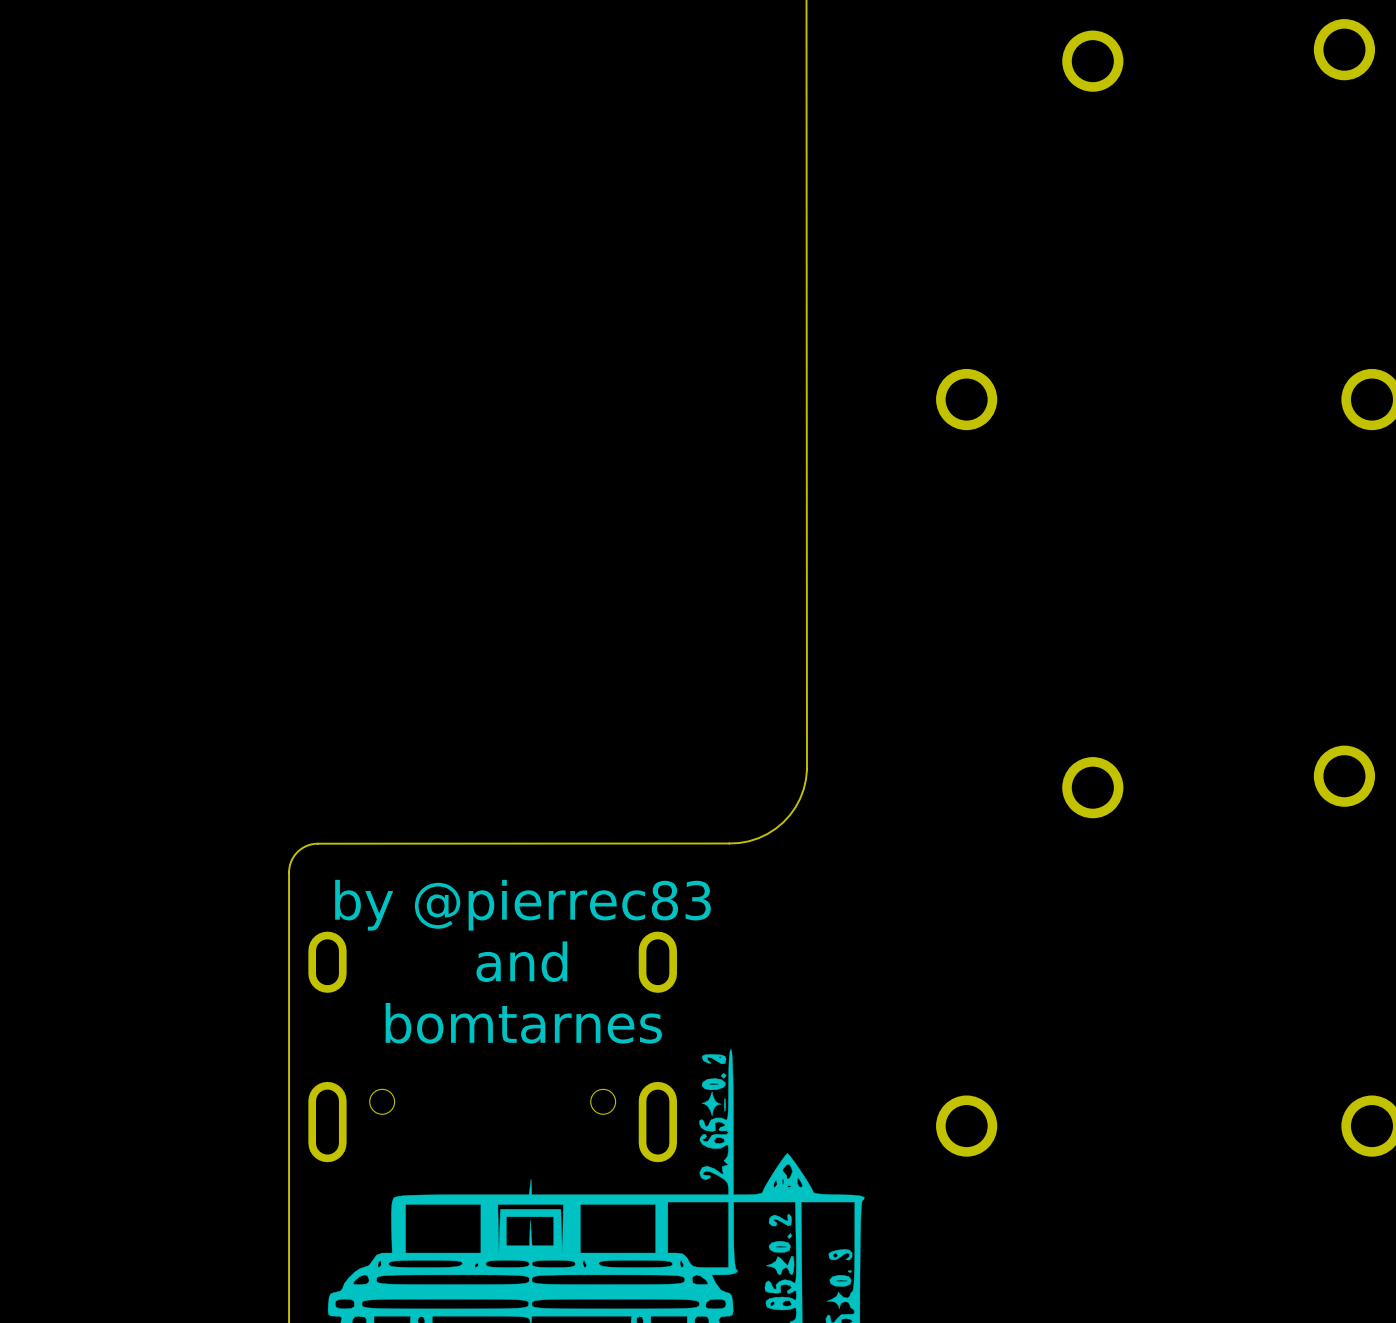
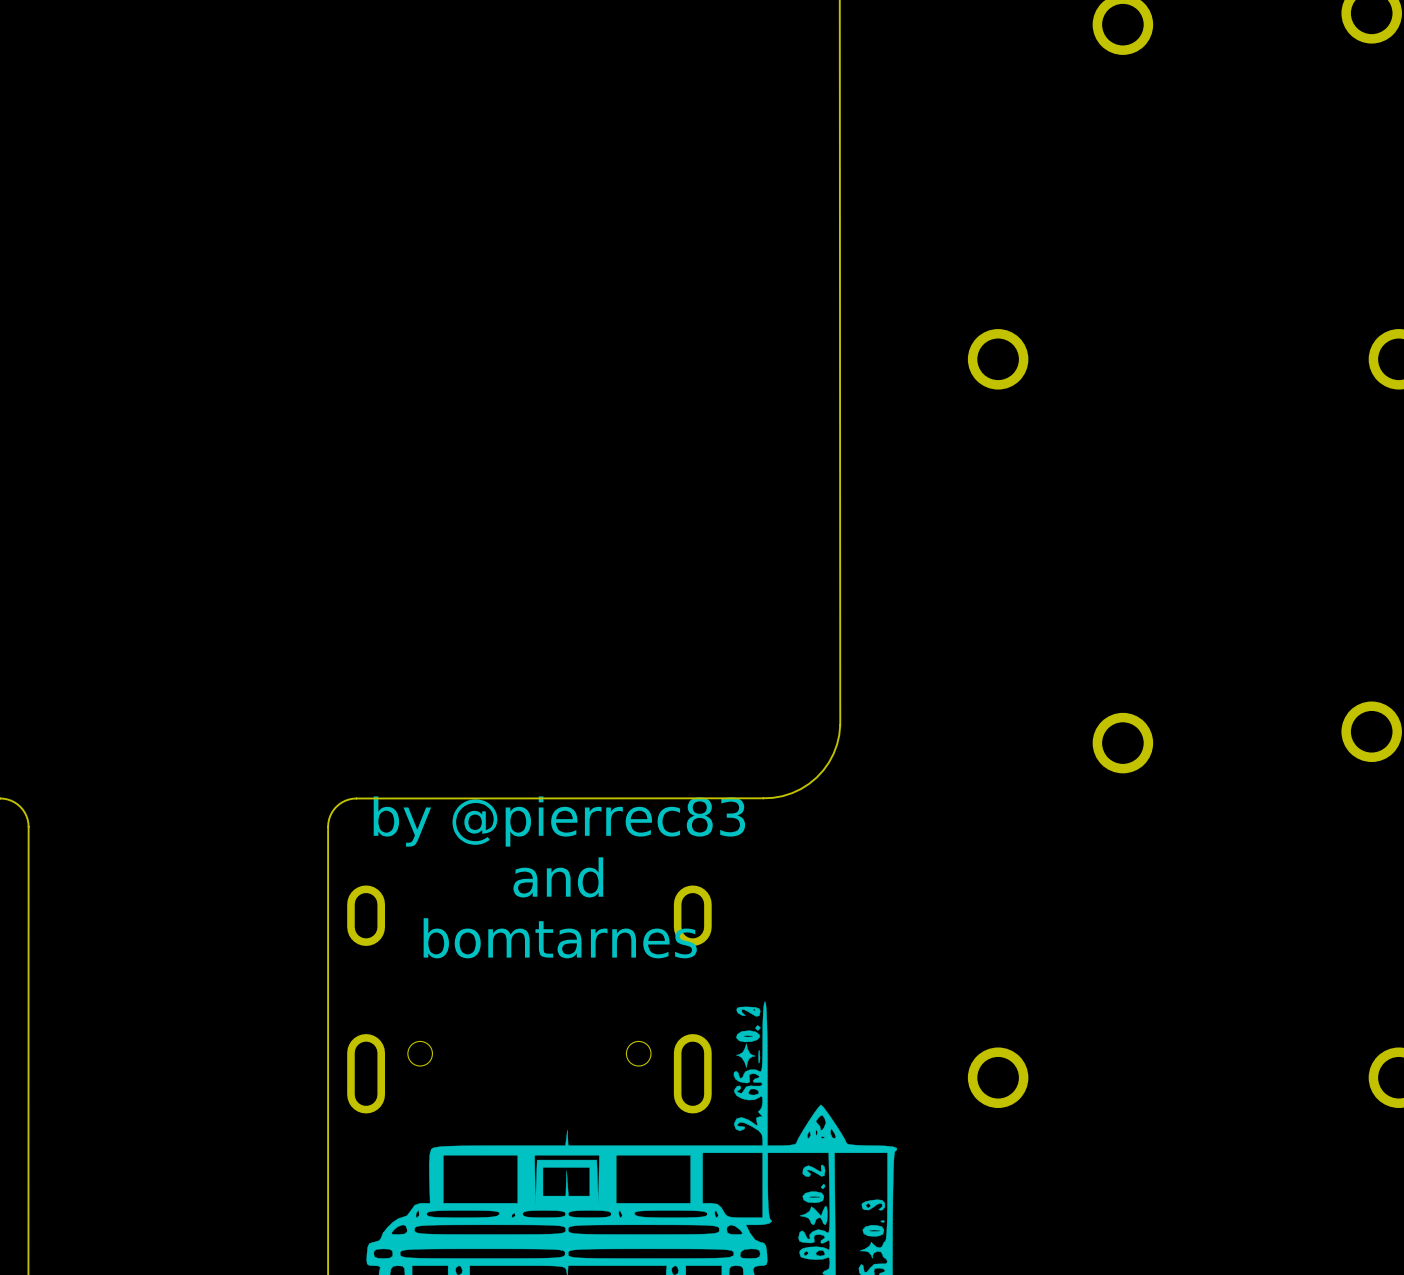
text position: by @pierrec83 (522, 905) -> by @pierrec83 (559, 821)
text position: and (521, 961) -> and (558, 877)
text position: bomtarnes (523, 1023) -> bomtarnes (560, 938)

